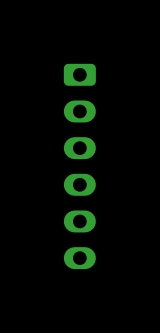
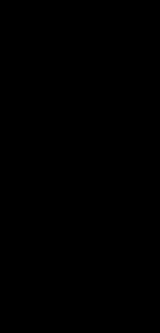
part: (79, 166) -> none

